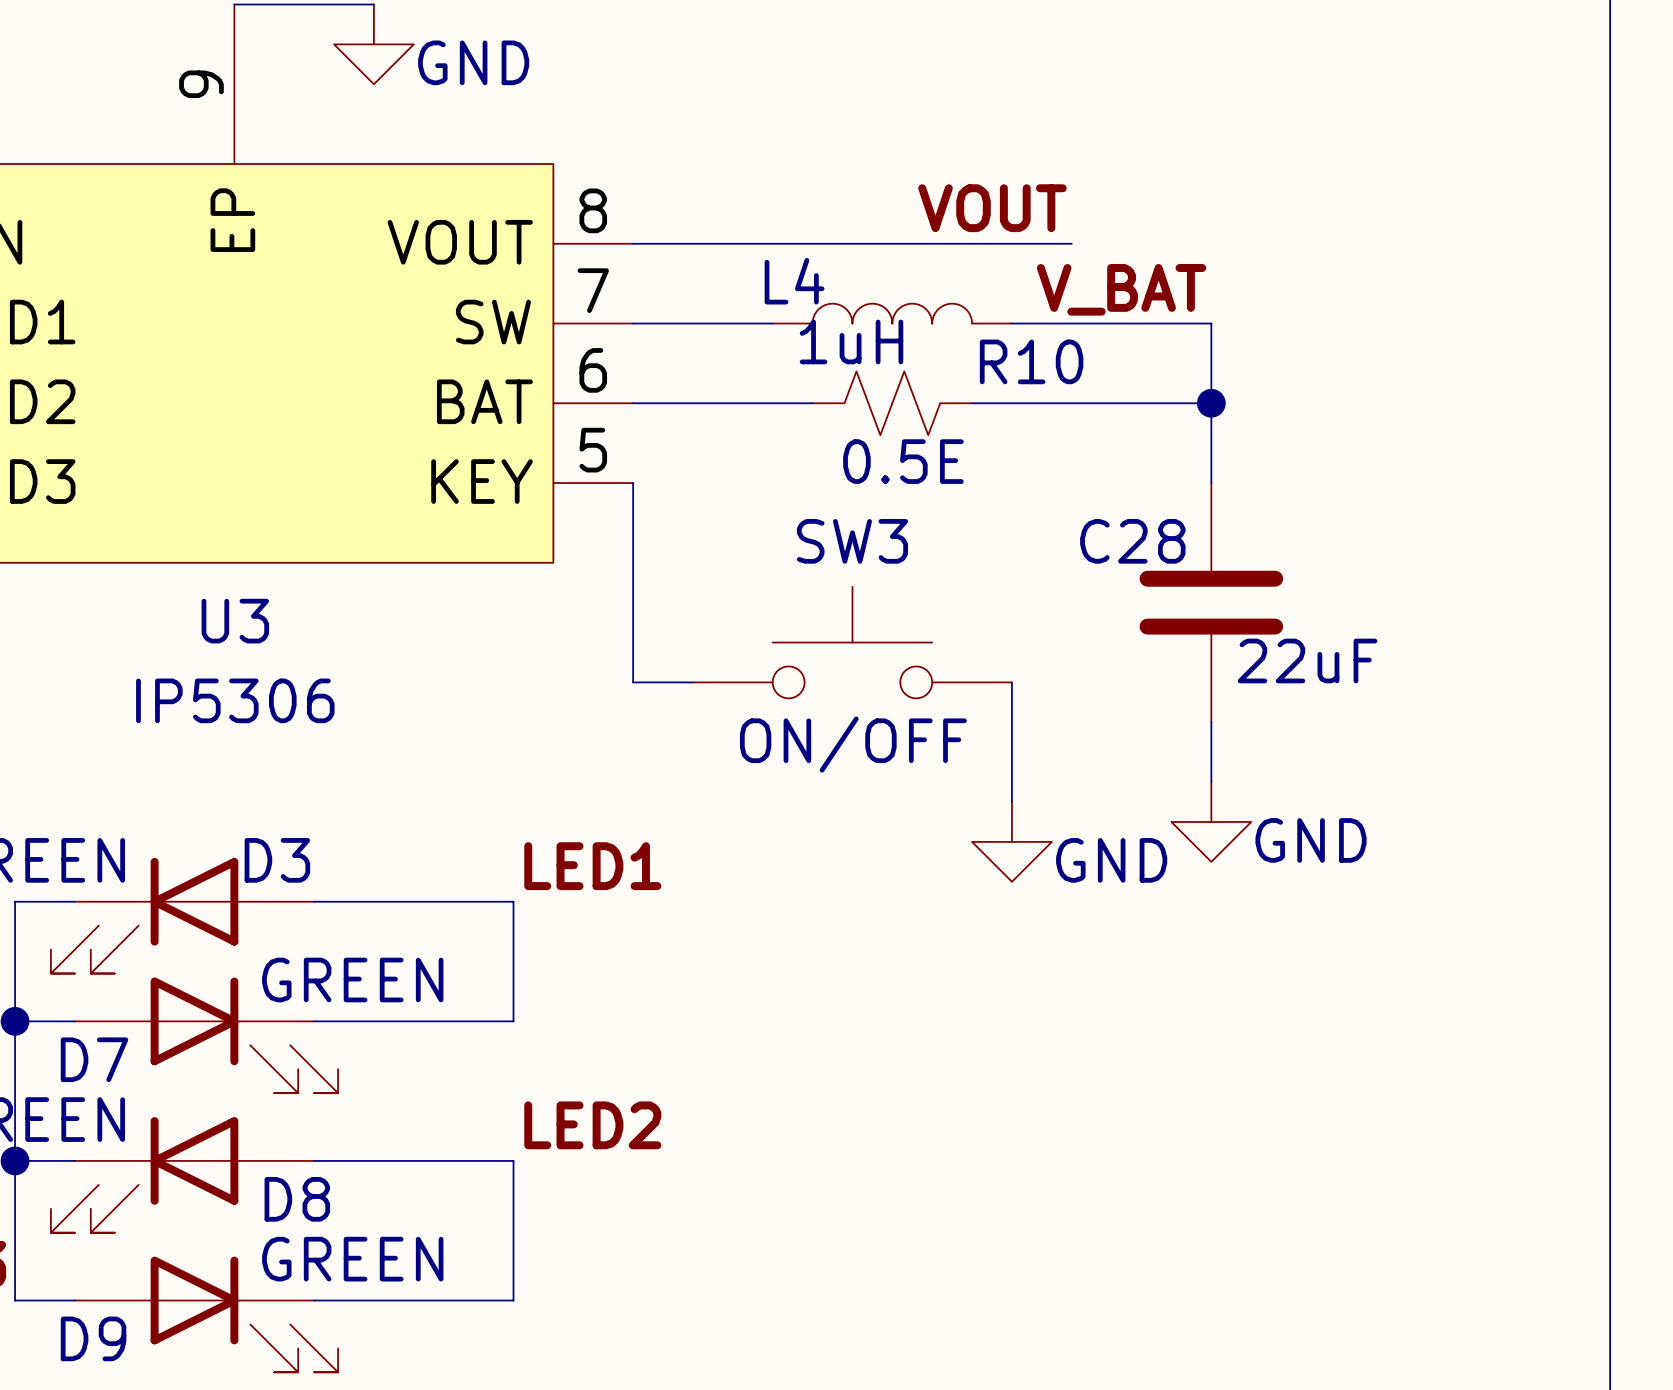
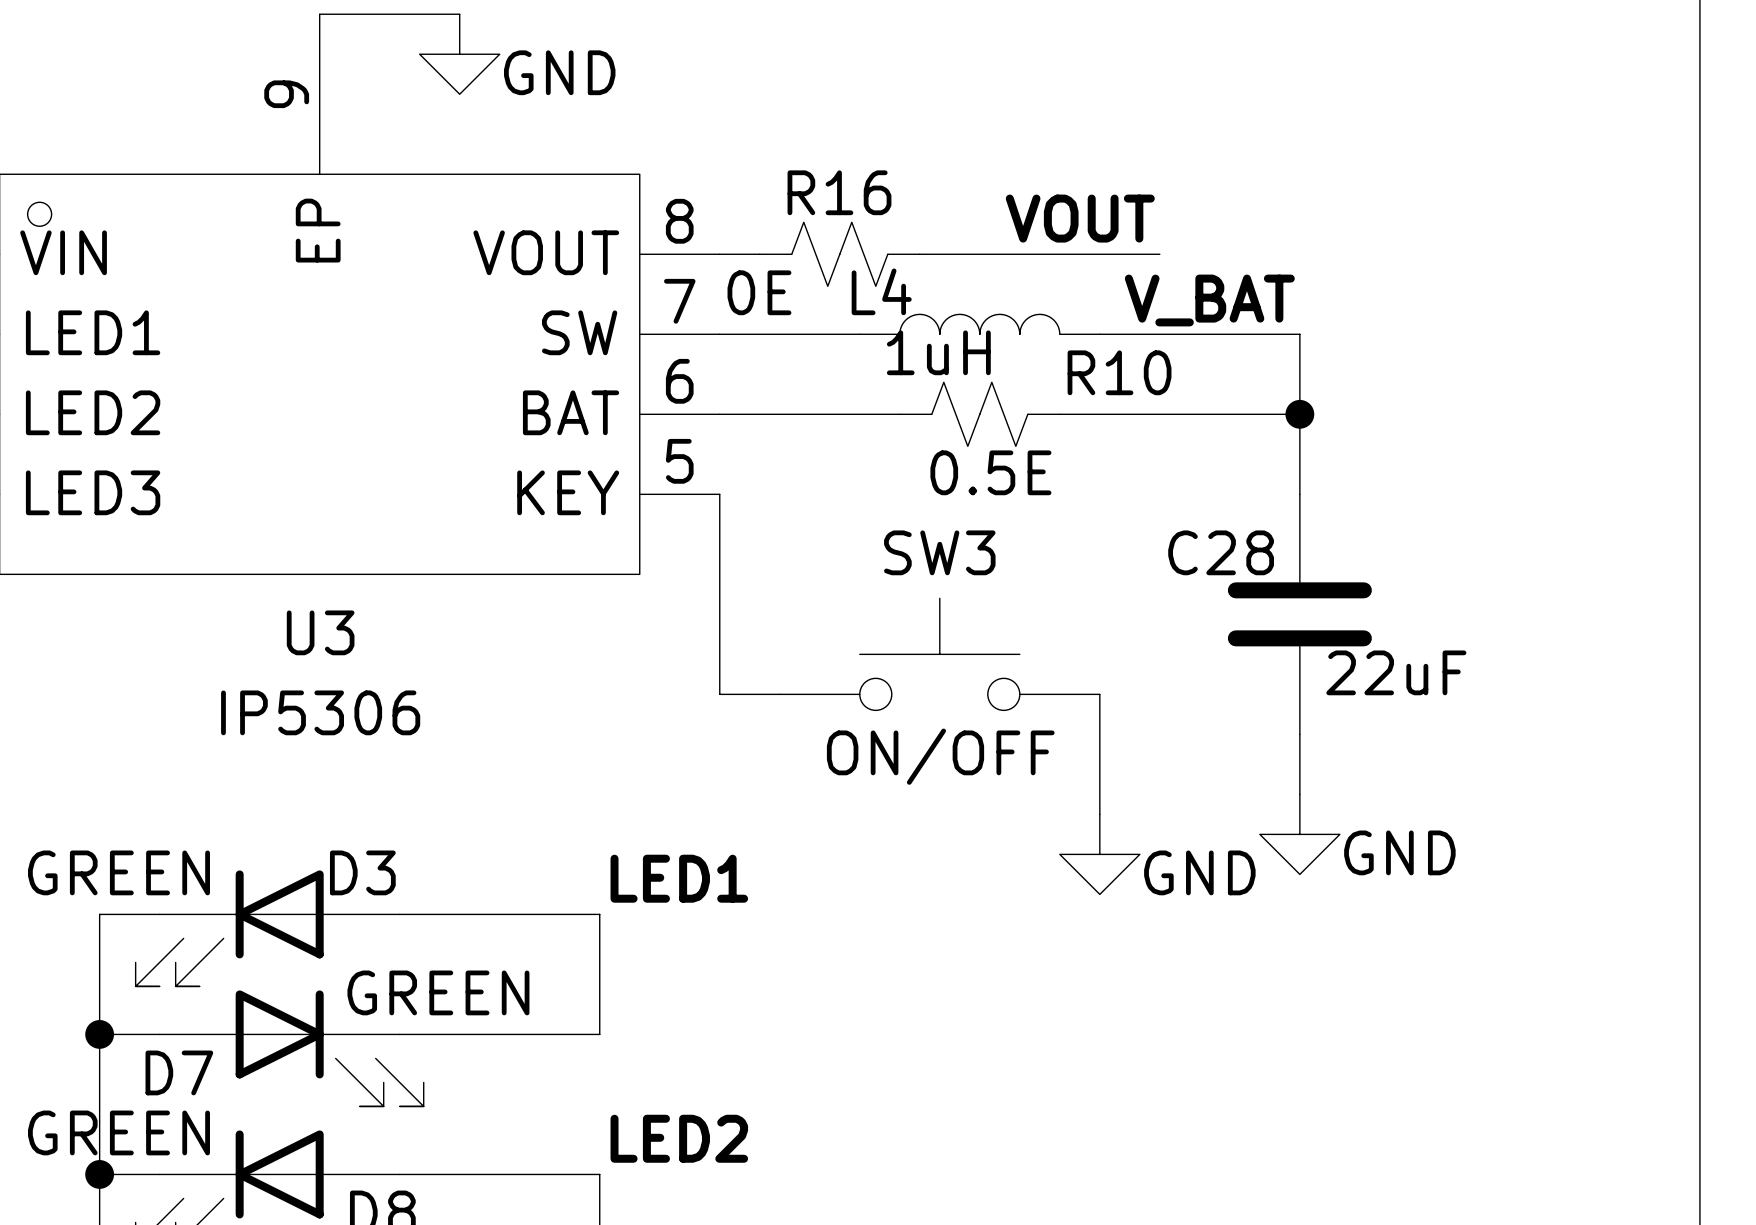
wire: (673, 243) (832, 243) -> none
R16: none -> 0E (839, 254)

